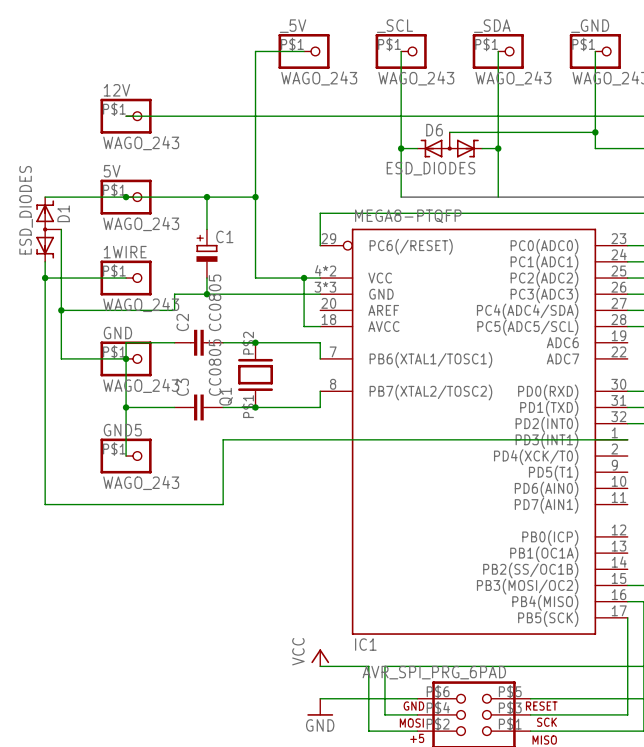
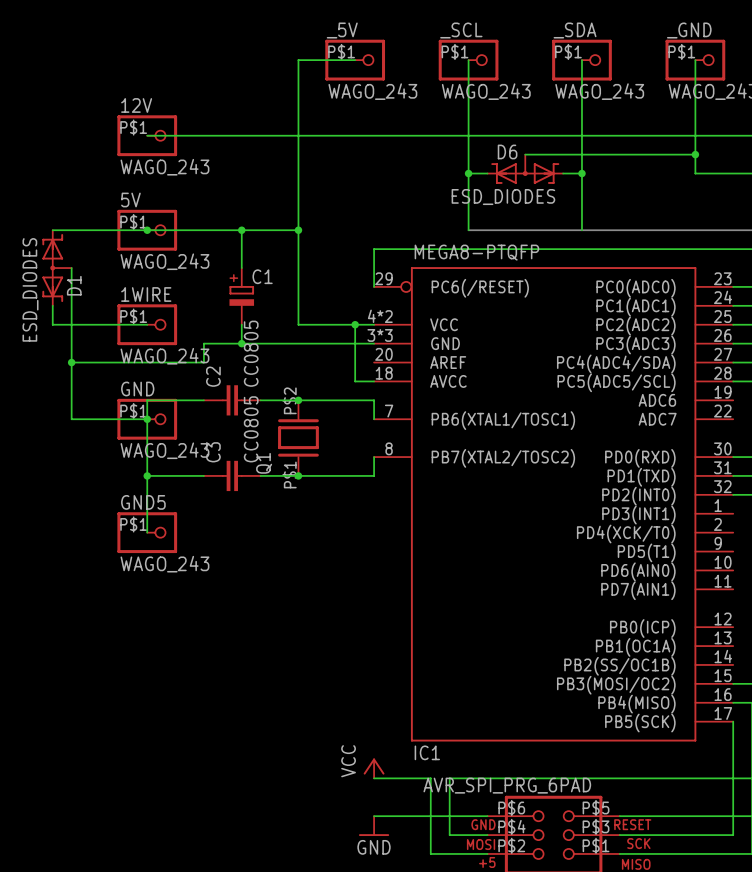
D1 value position: ESD_DIODES (26, 210) -> ESD_DIODES (30, 289)
D1 name position: D1 (63, 213) -> D1 (74, 285)
wire: (45, 278) (45, 504) (223, 504) (223, 439) (627, 439) -> none
junction: (45, 278) -> none

